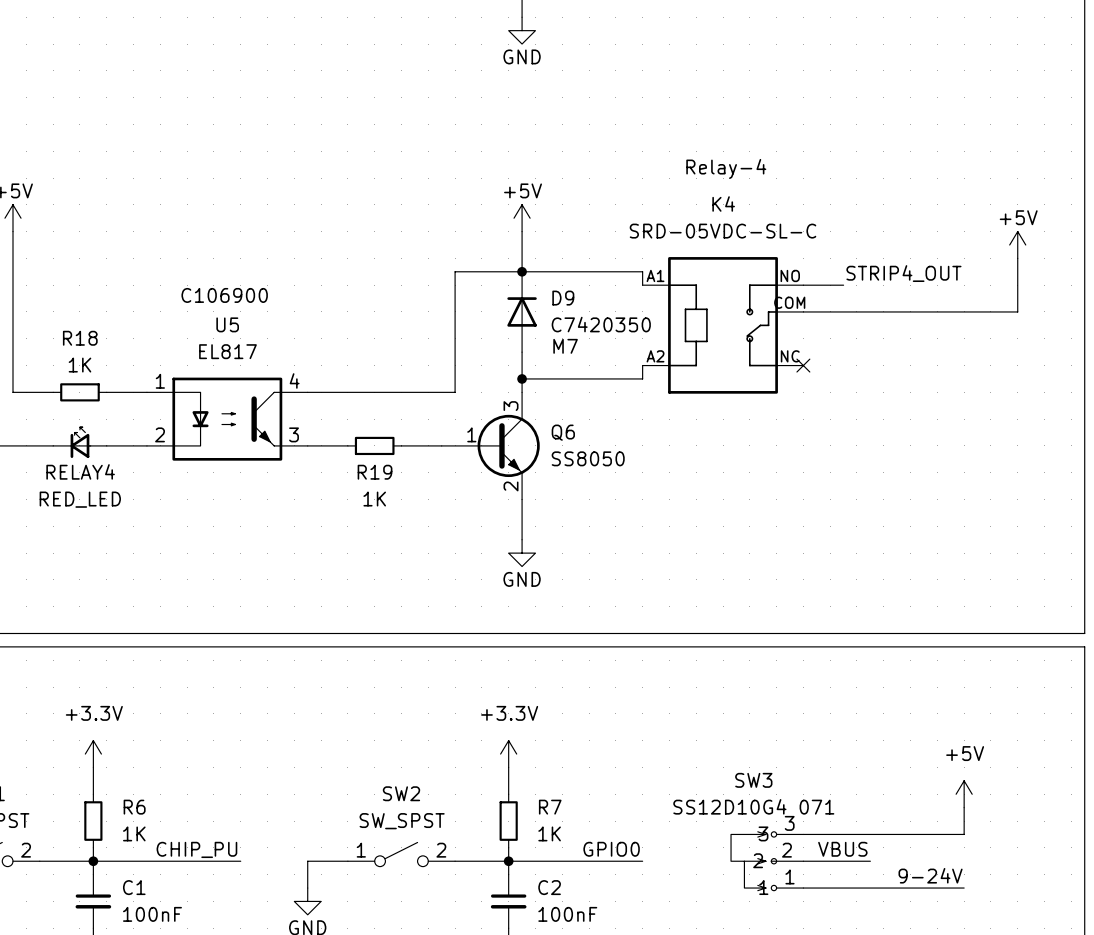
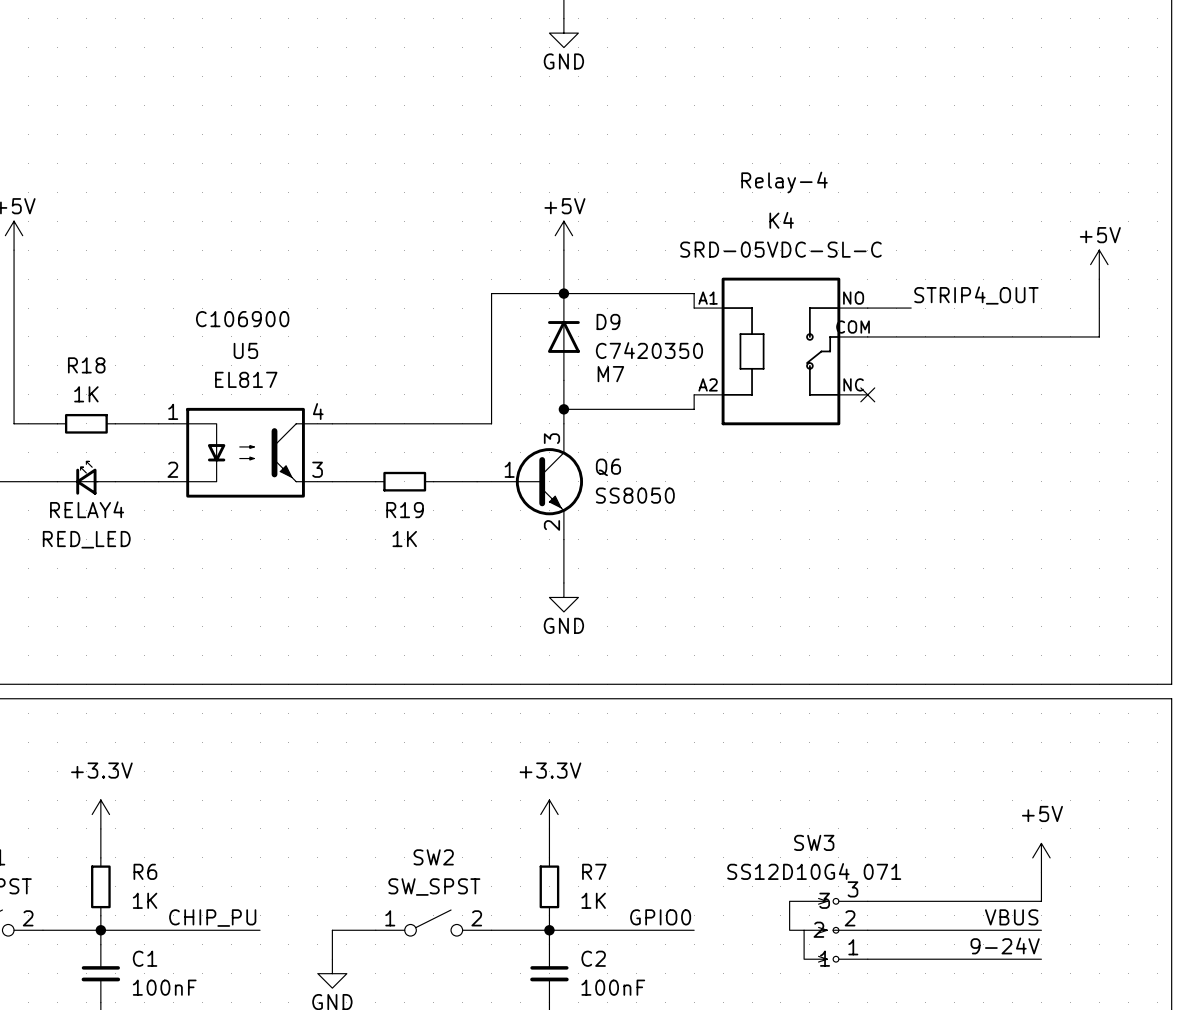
label position: VBUS (842, 849) -> VBUS (1011, 917)
wire: none -> (940, 930) (1041, 930)

